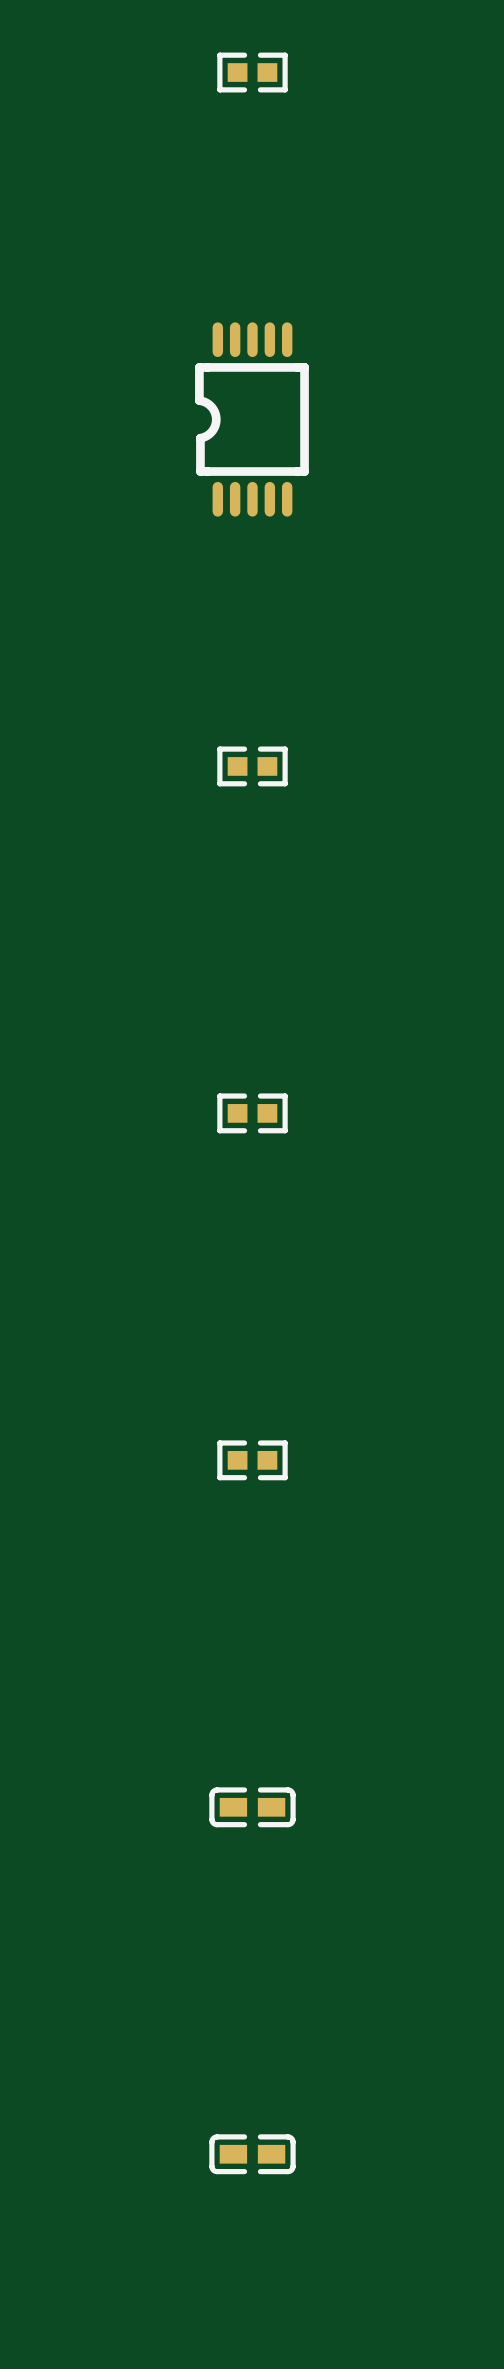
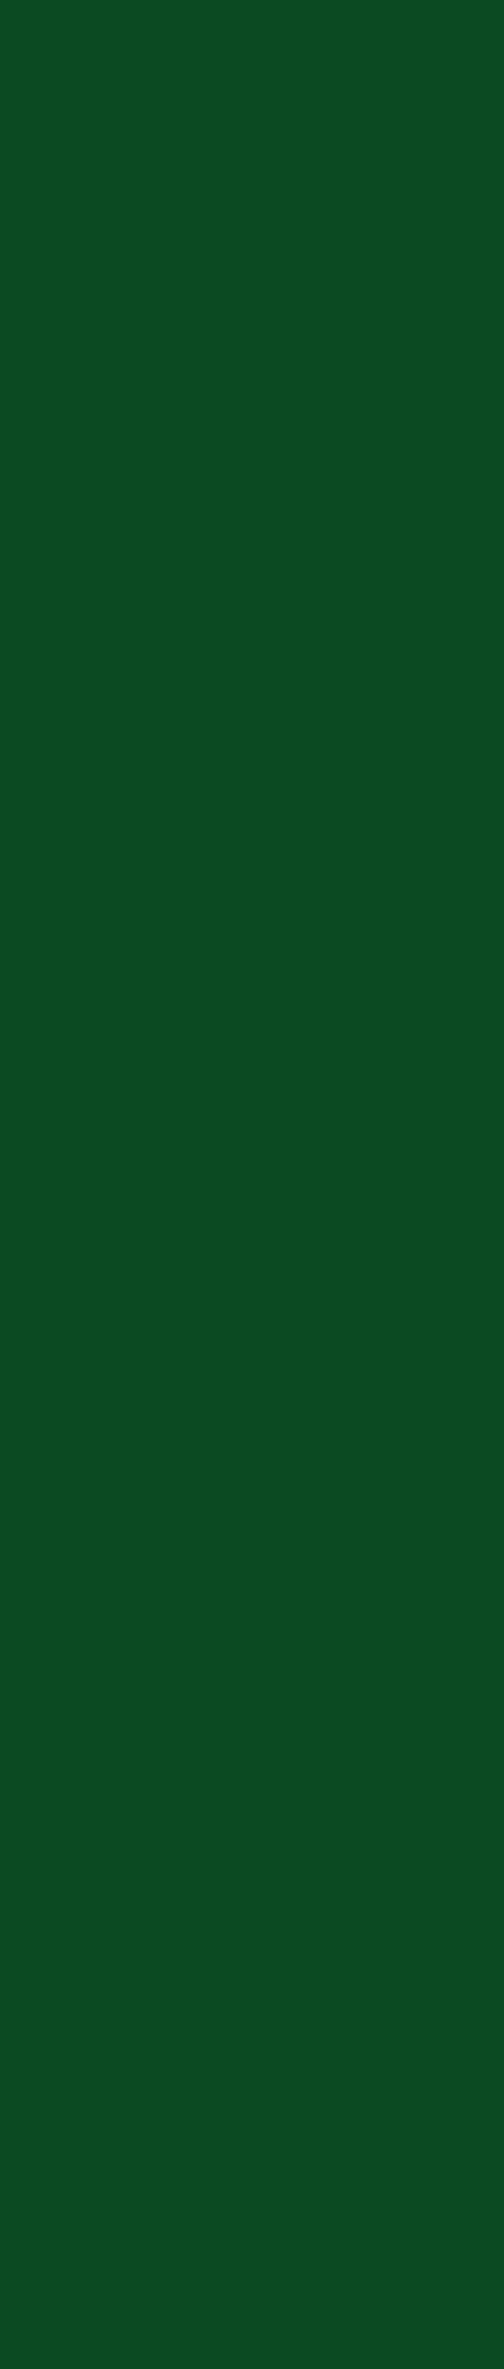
part: (252, 72) -> none
part: (251, 419) -> none
part: (252, 766) -> none
part: (252, 1113) -> none
part: (252, 1460) -> none
part: (252, 1807) -> none
part: (252, 2154) -> none

